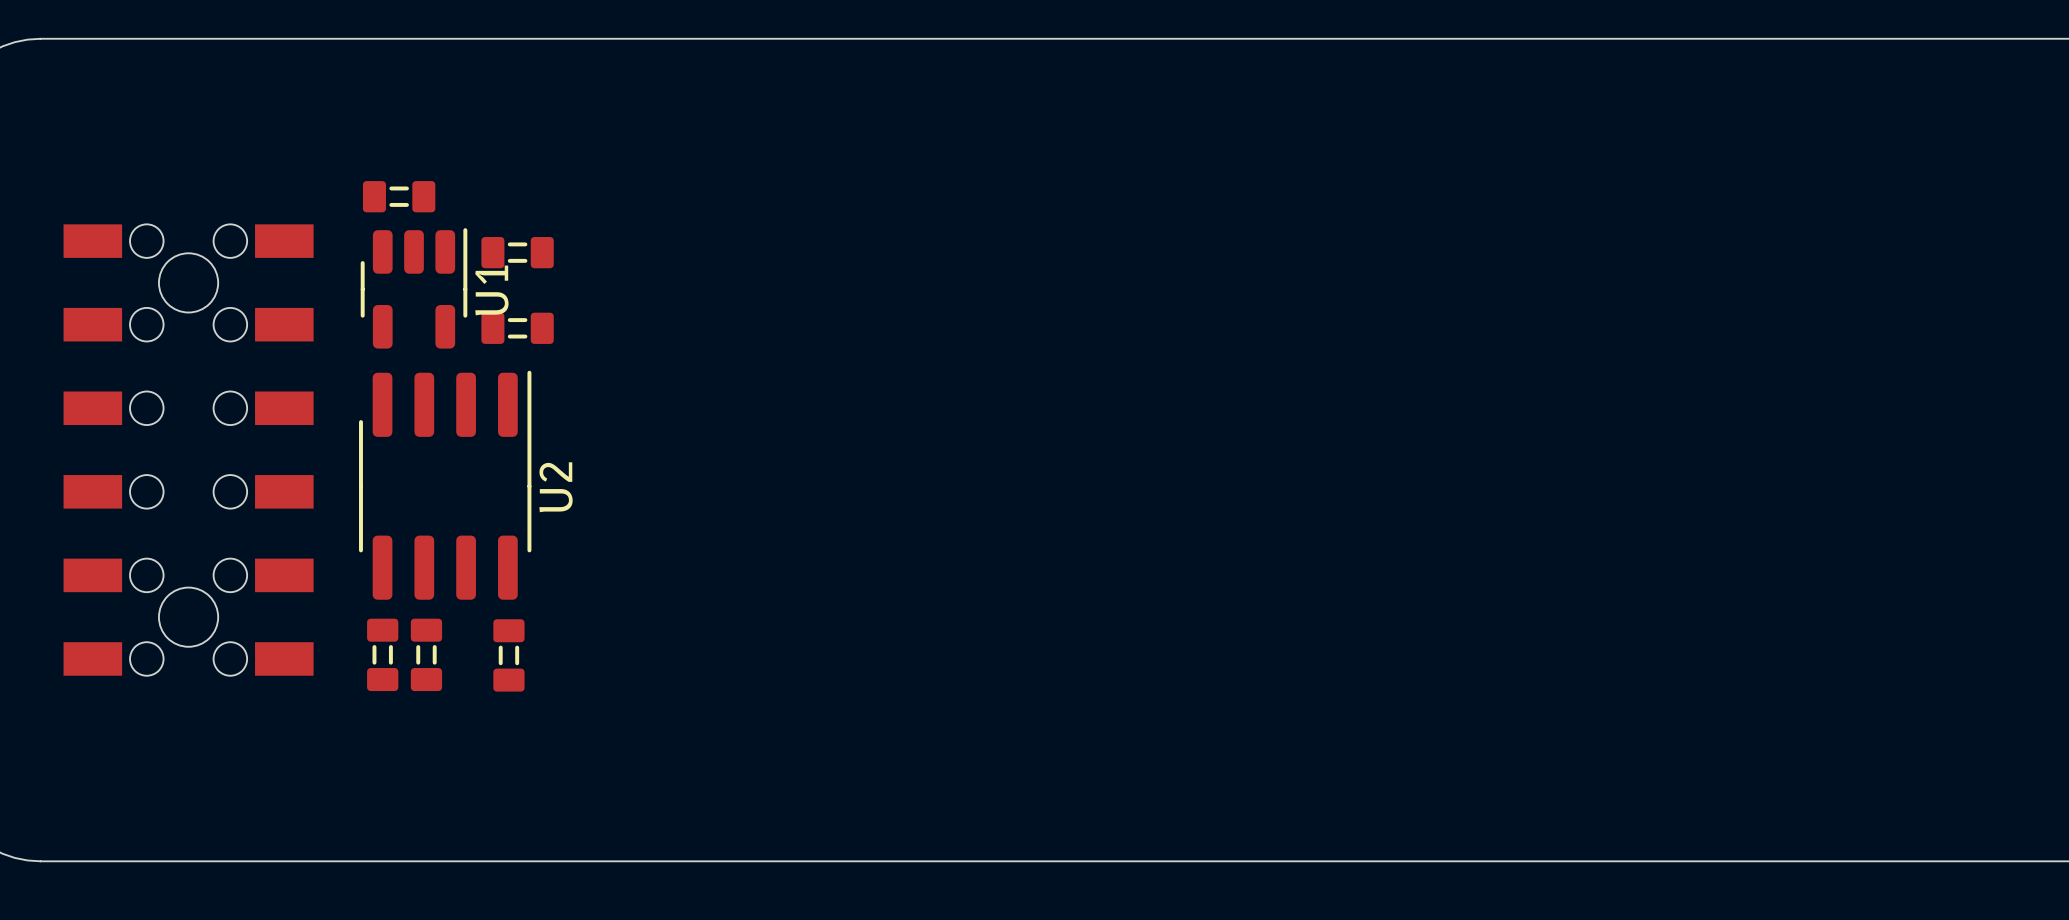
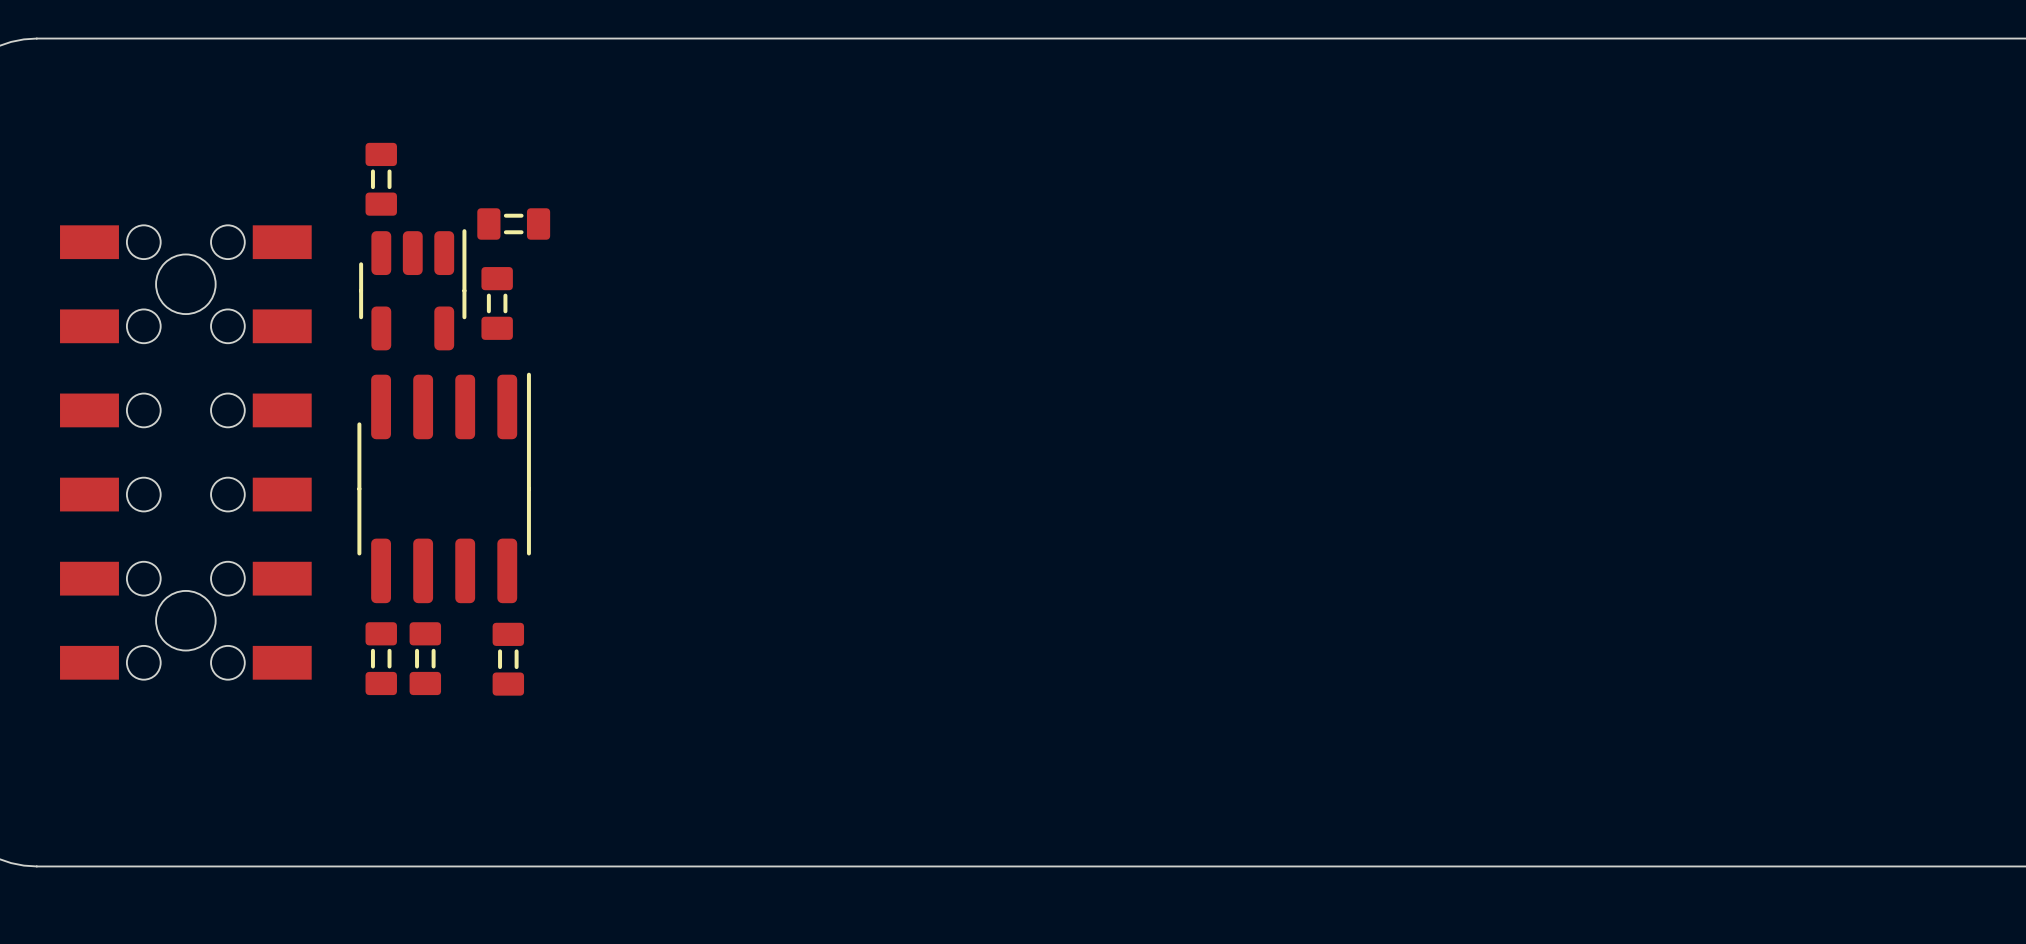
part rotation: 0° (399, 196) -> 90° clockwise (381, 179)
part: none -> (513, 223)
part: (517, 252) -> none
U1 name: U1 (491, 290) -> none
part: none -> (497, 303)
part: (517, 328) -> none
U2 name: U2 (556, 487) -> none

